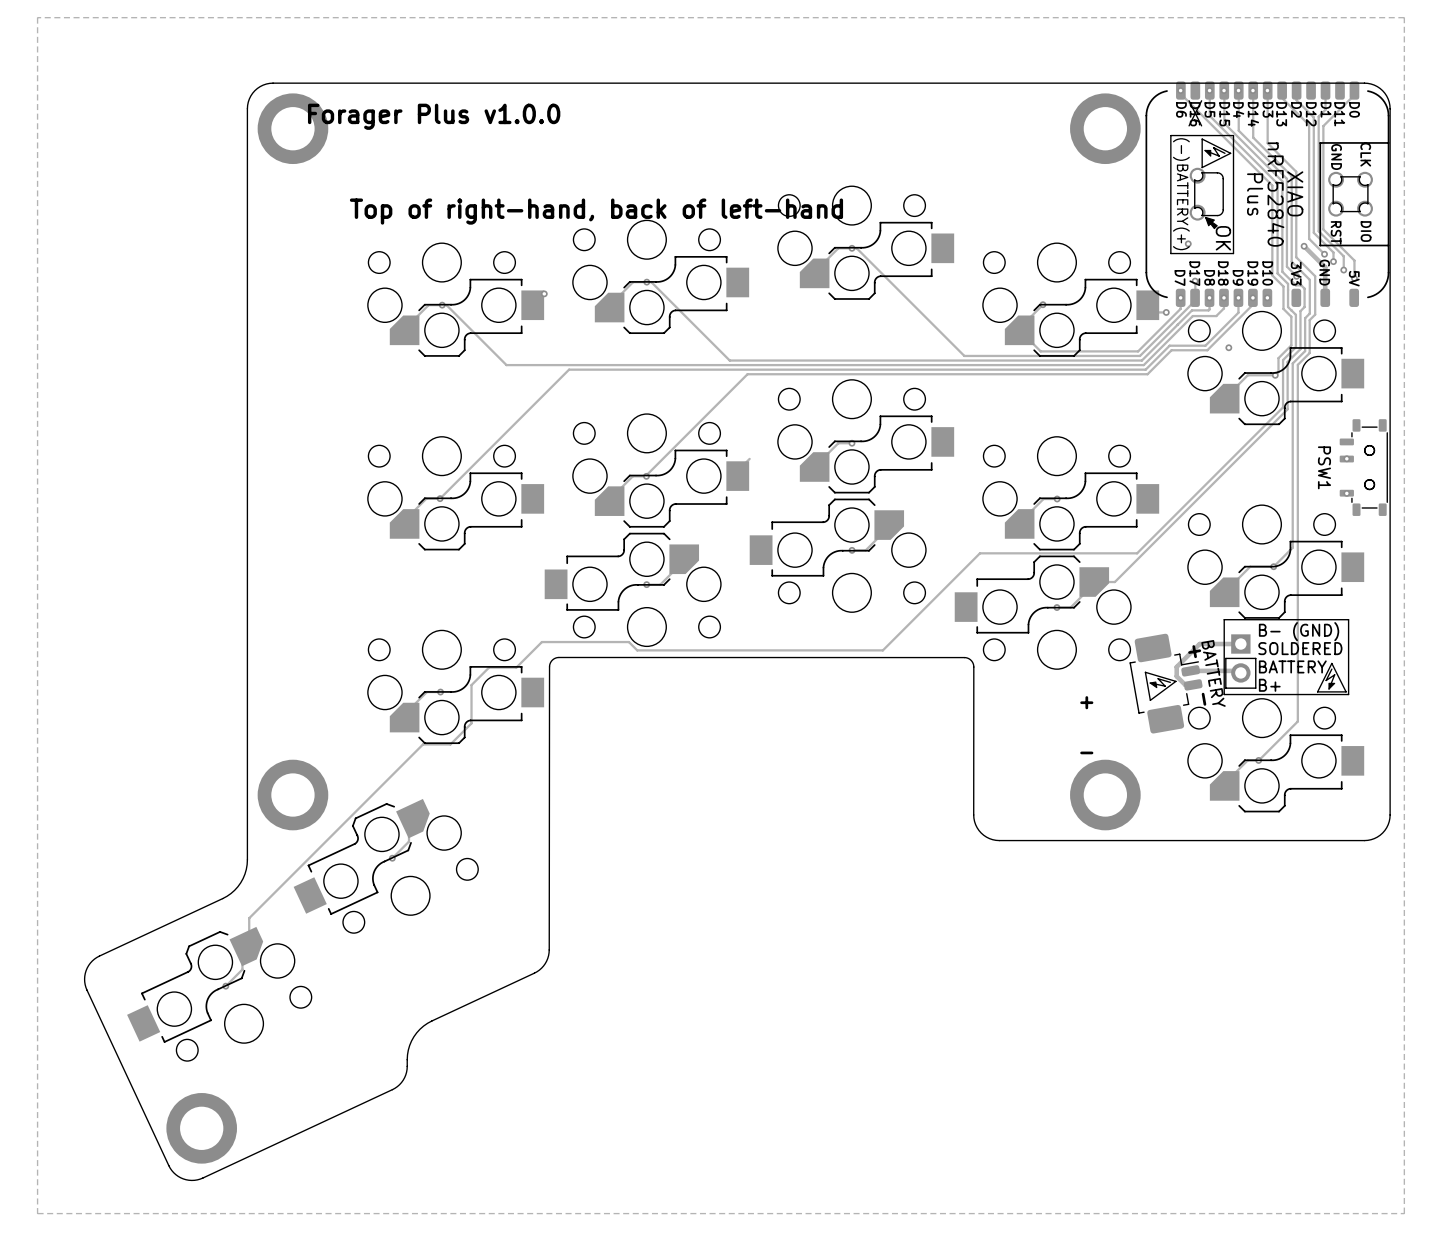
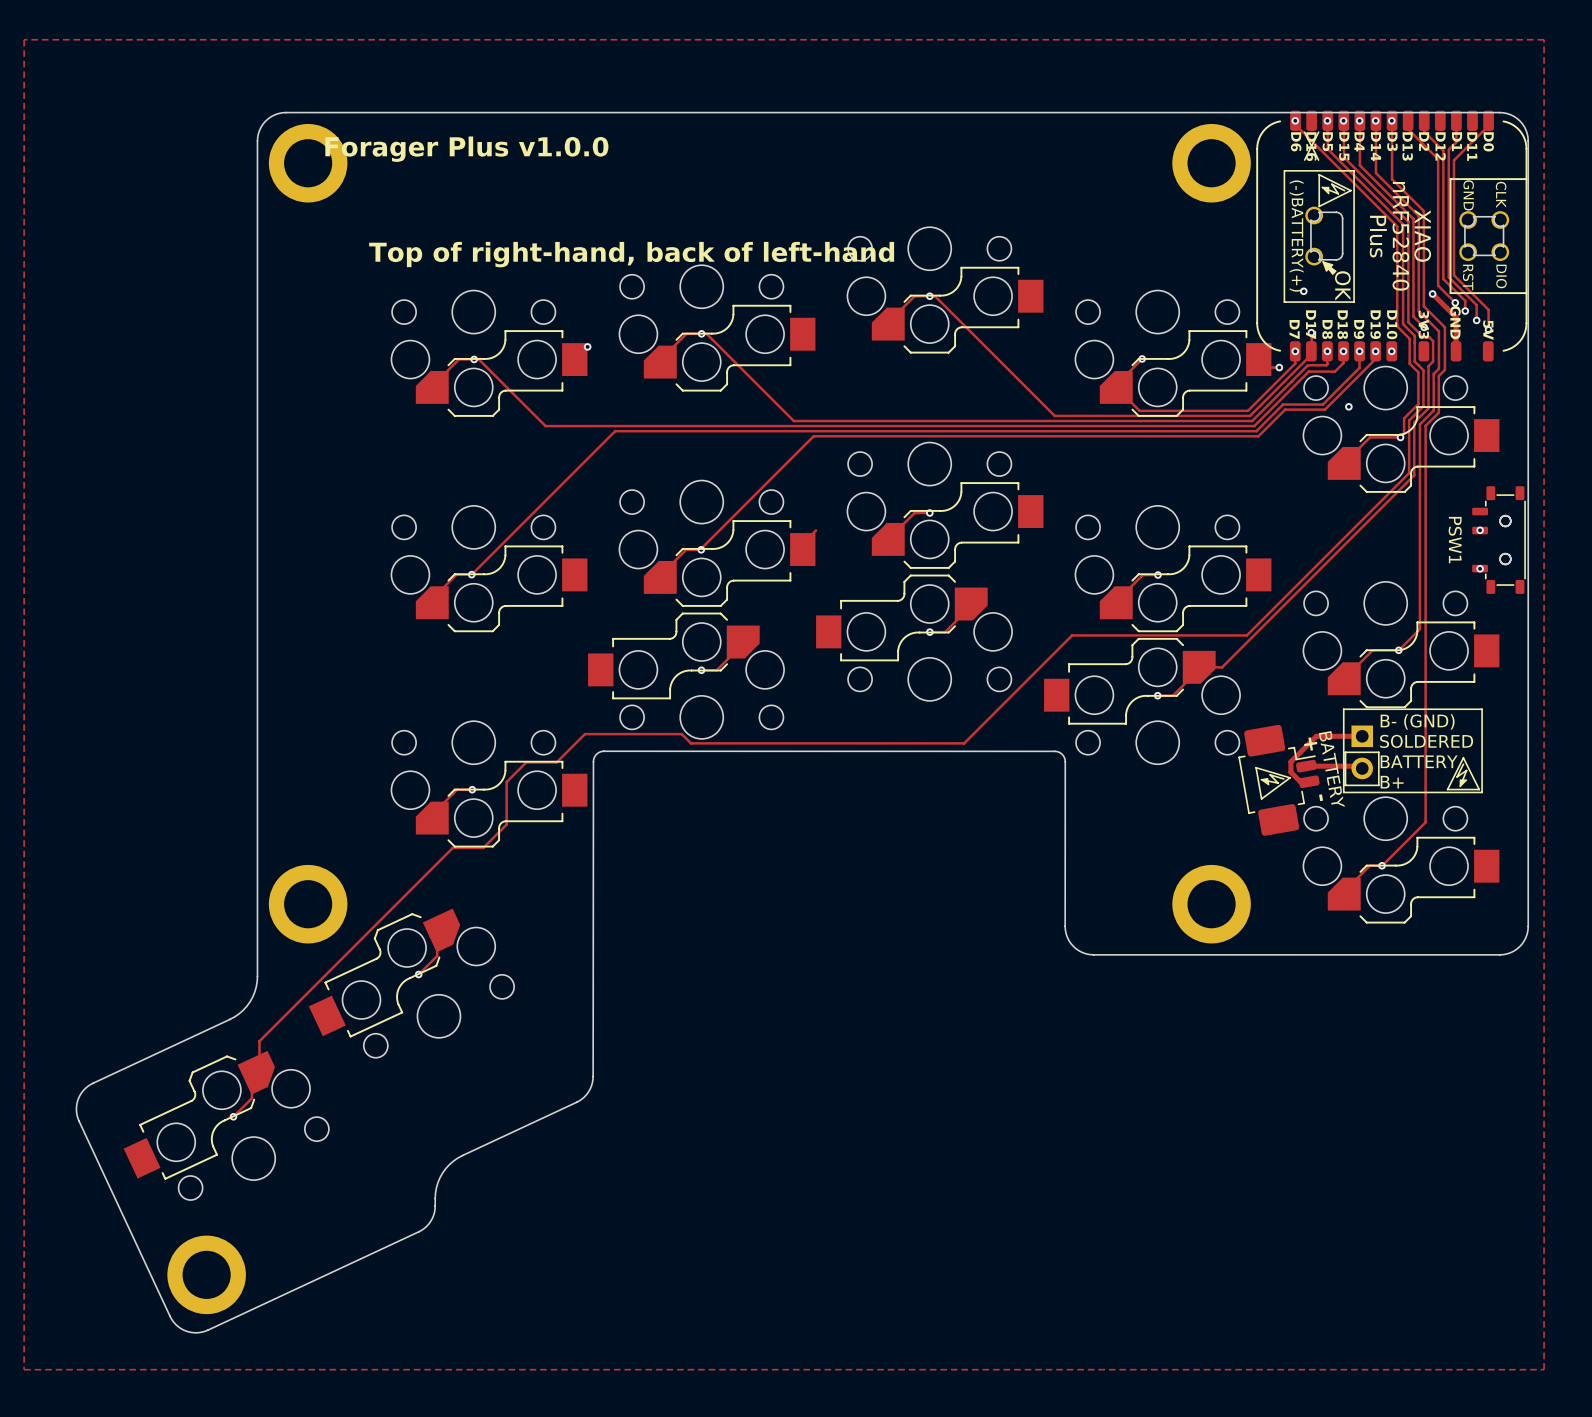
text: + (1086, 702) -> none
text: - (1086, 752) -> none

